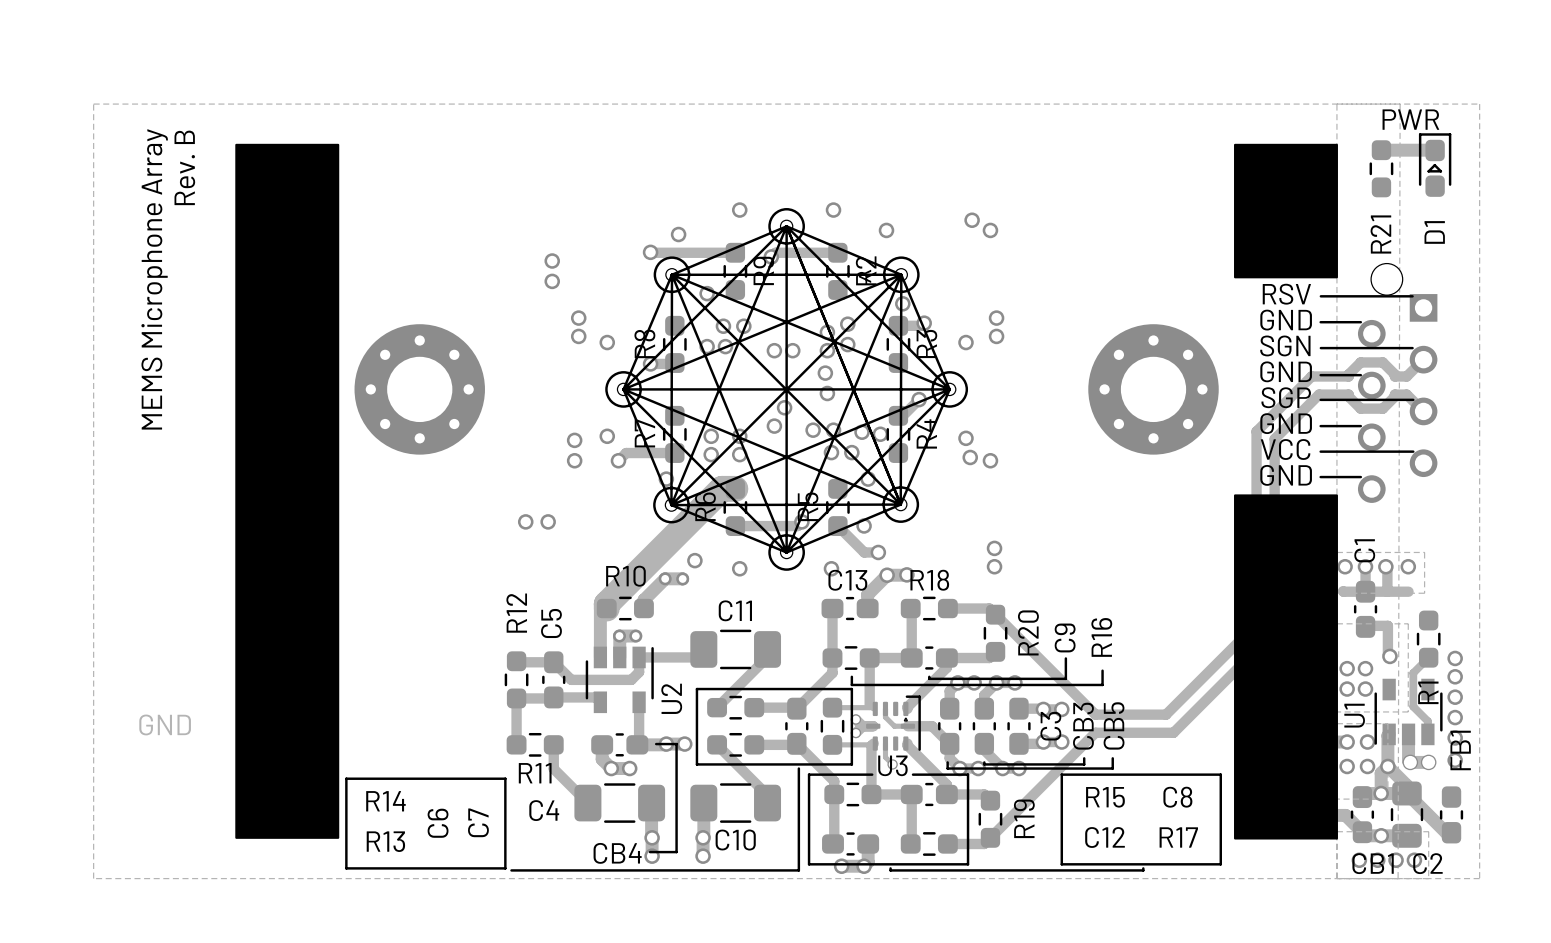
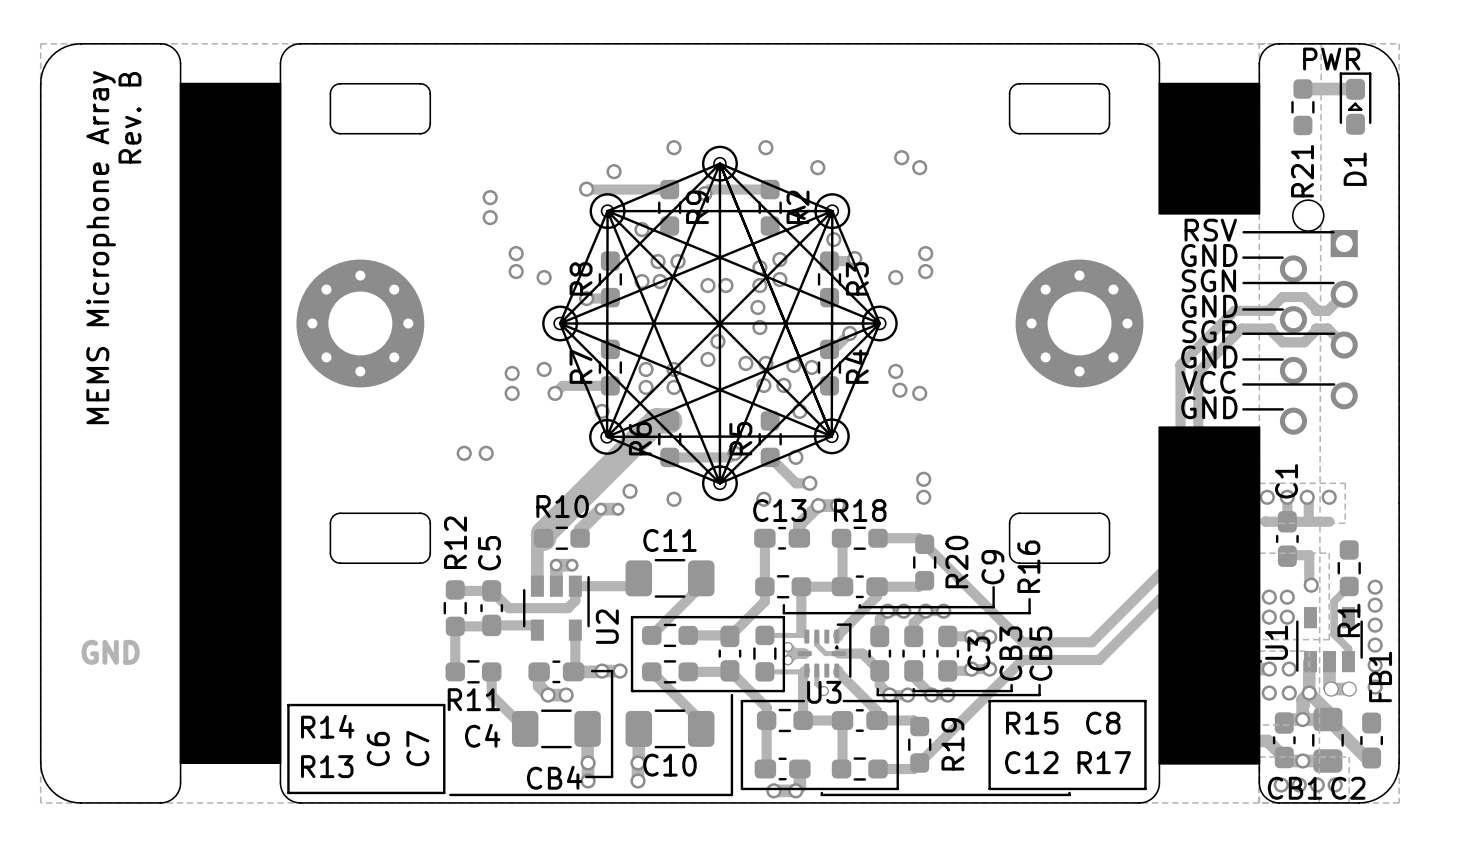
board edge: none -> (80, 43) (168, 45) (176, 51) (179, 58) (180, 83) (280, 83) (280, 61) (283, 53) (290, 46) (300, 43) (1139, 43) (1149, 46) (1156, 53) (1159, 61) (1159, 83) (1259, 83) (1260, 56) (1267, 47) (1276, 43) (1359, 43) (1379, 49) (1393, 63) (1399, 83) (1399, 762) (1393, 782) (1383, 794) (1364, 802) (1276, 802) (1267, 798) (1260, 790) (1259, 762) (1159, 762) (1159, 785) (1156, 792) (1149, 800) (1139, 802) (300, 802) (290, 800) (283, 792) (280, 785) (280, 762) (180, 762) (179, 790) (172, 798) (165, 802) (80, 802) (60, 797) (46, 782) (40, 762) (40, 83) (43, 68) (52, 55) (65, 46) (80, 43)
board edge: none -> (340, 83) (425, 85) (430, 92) (428, 128) (420, 133) (335, 132) (330, 125) (330, 92) (334, 85) (340, 83)
board edge: none -> (1019, 83) (1104, 85) (1109, 92) (1108, 128) (1099, 133) (1014, 132) (1009, 125) (1009, 92) (1013, 85) (1019, 83)
board edge: none -> (340, 513) (425, 514) (430, 521) (428, 558) (420, 563) (335, 561) (330, 554) (330, 521) (334, 515) (340, 513)
board edge: none -> (1019, 513) (1104, 514) (1109, 521) (1108, 558) (1099, 563) (1014, 561) (1009, 554) (1009, 521) (1013, 515) (1019, 513)

